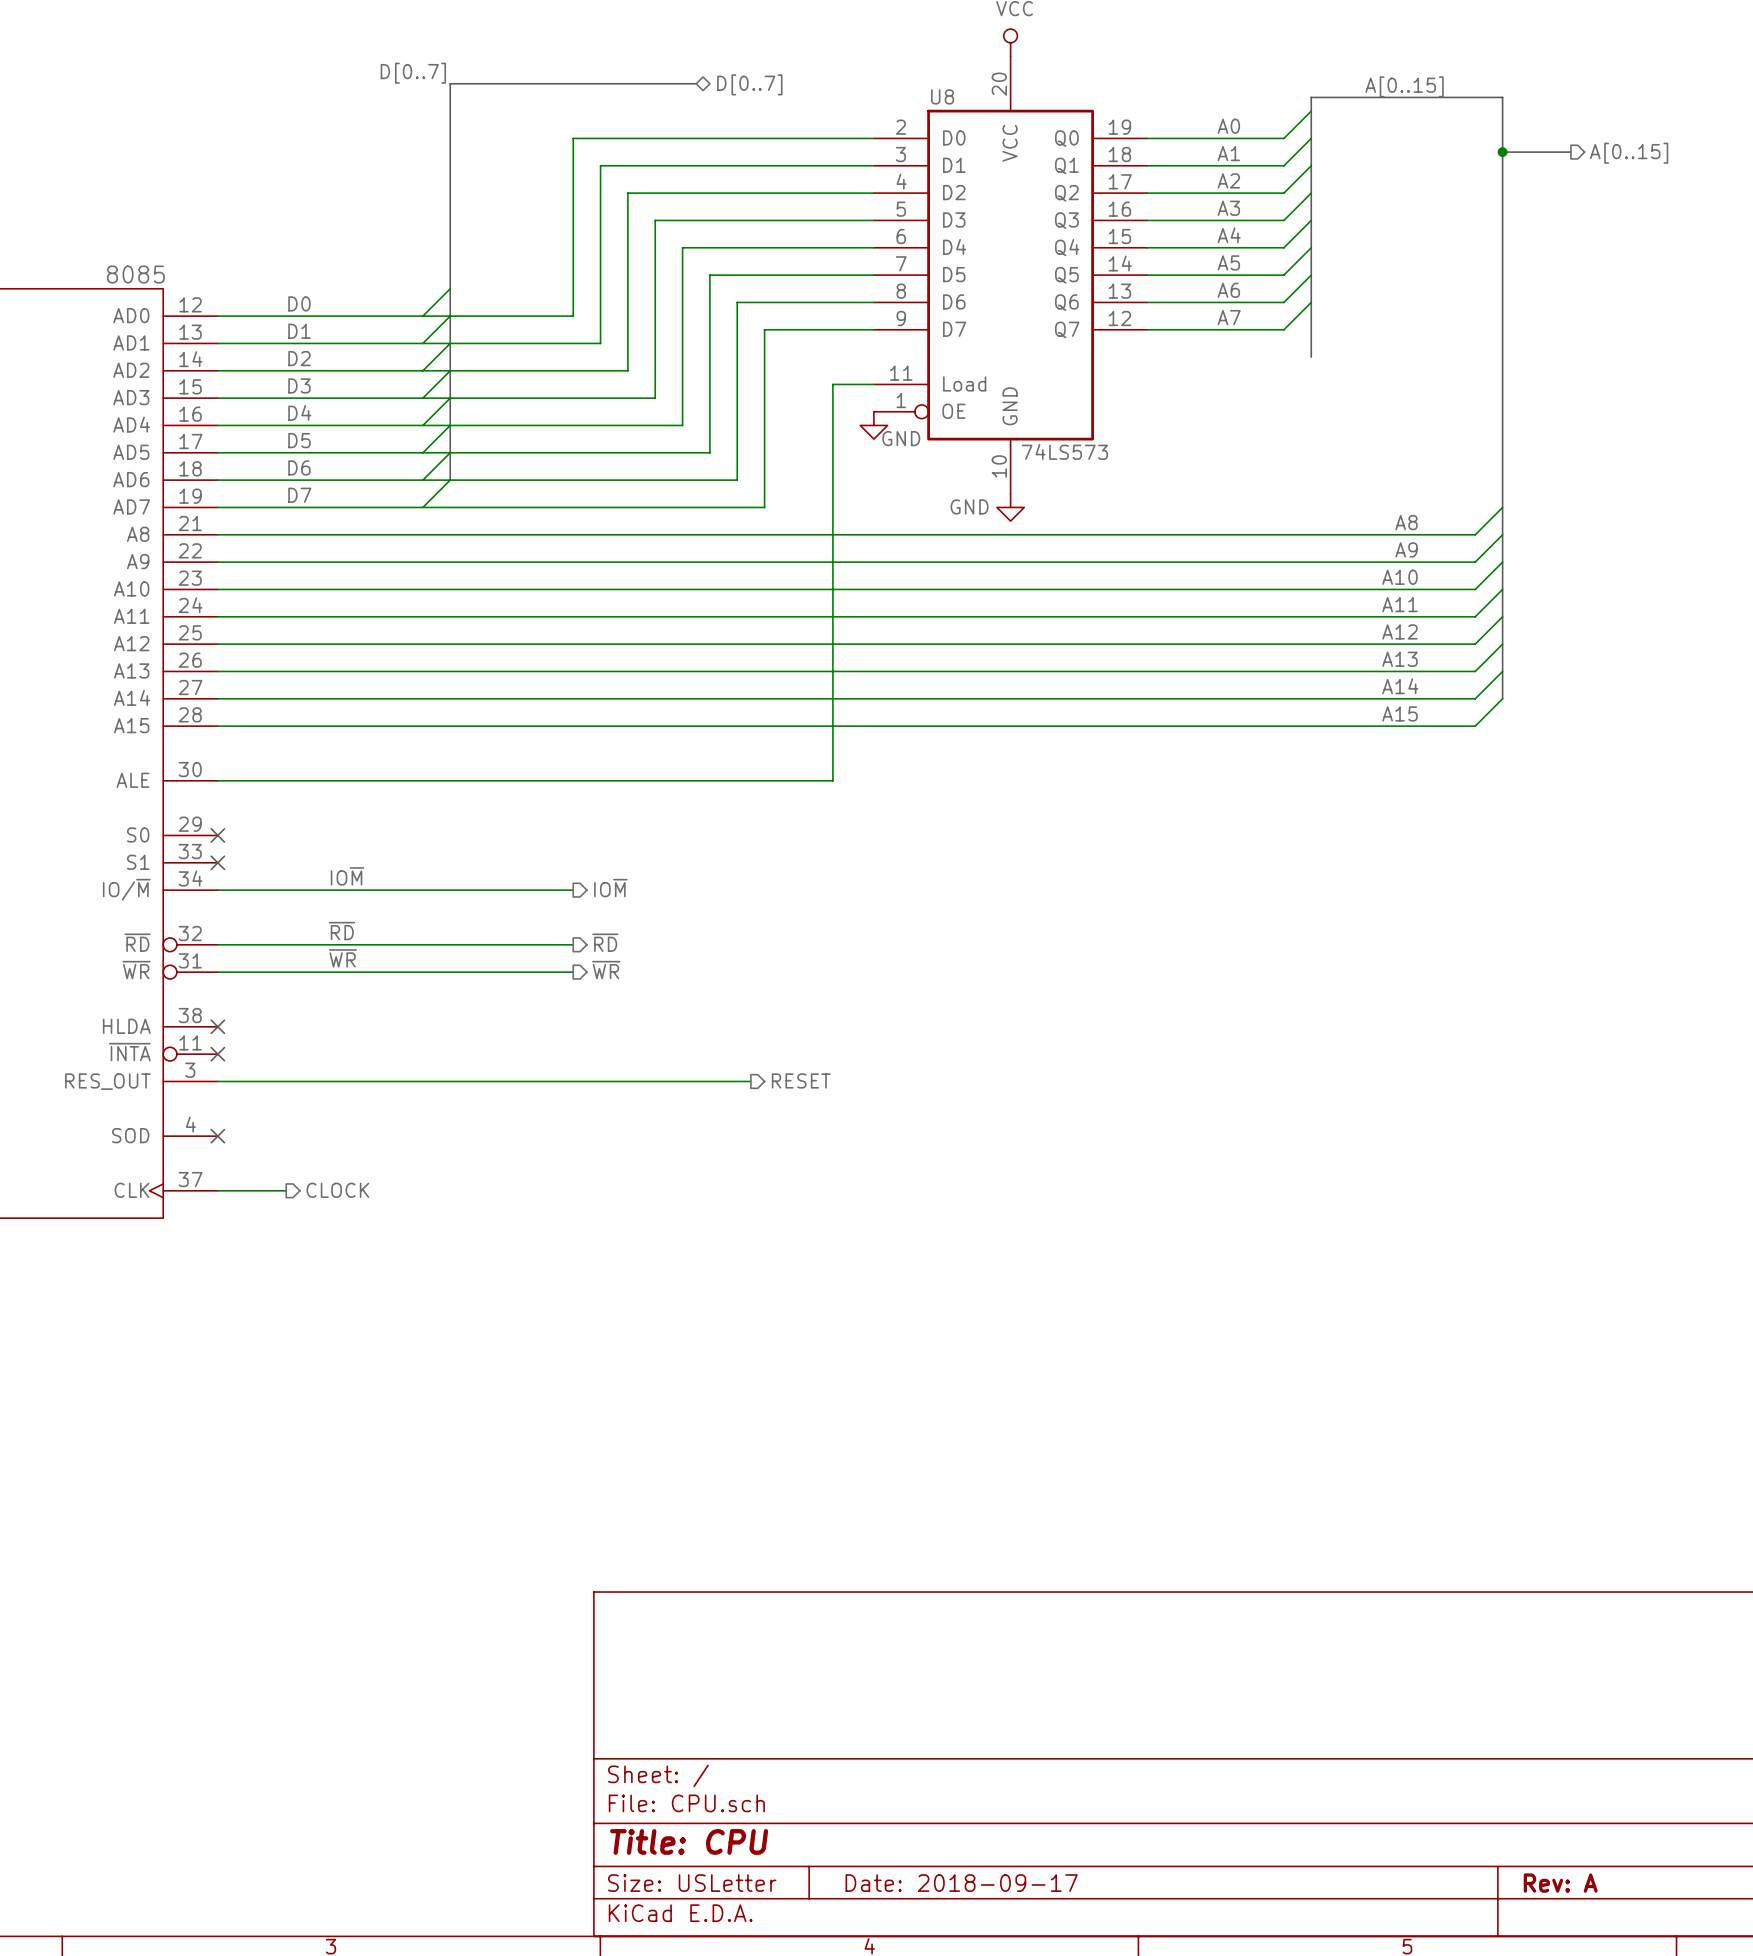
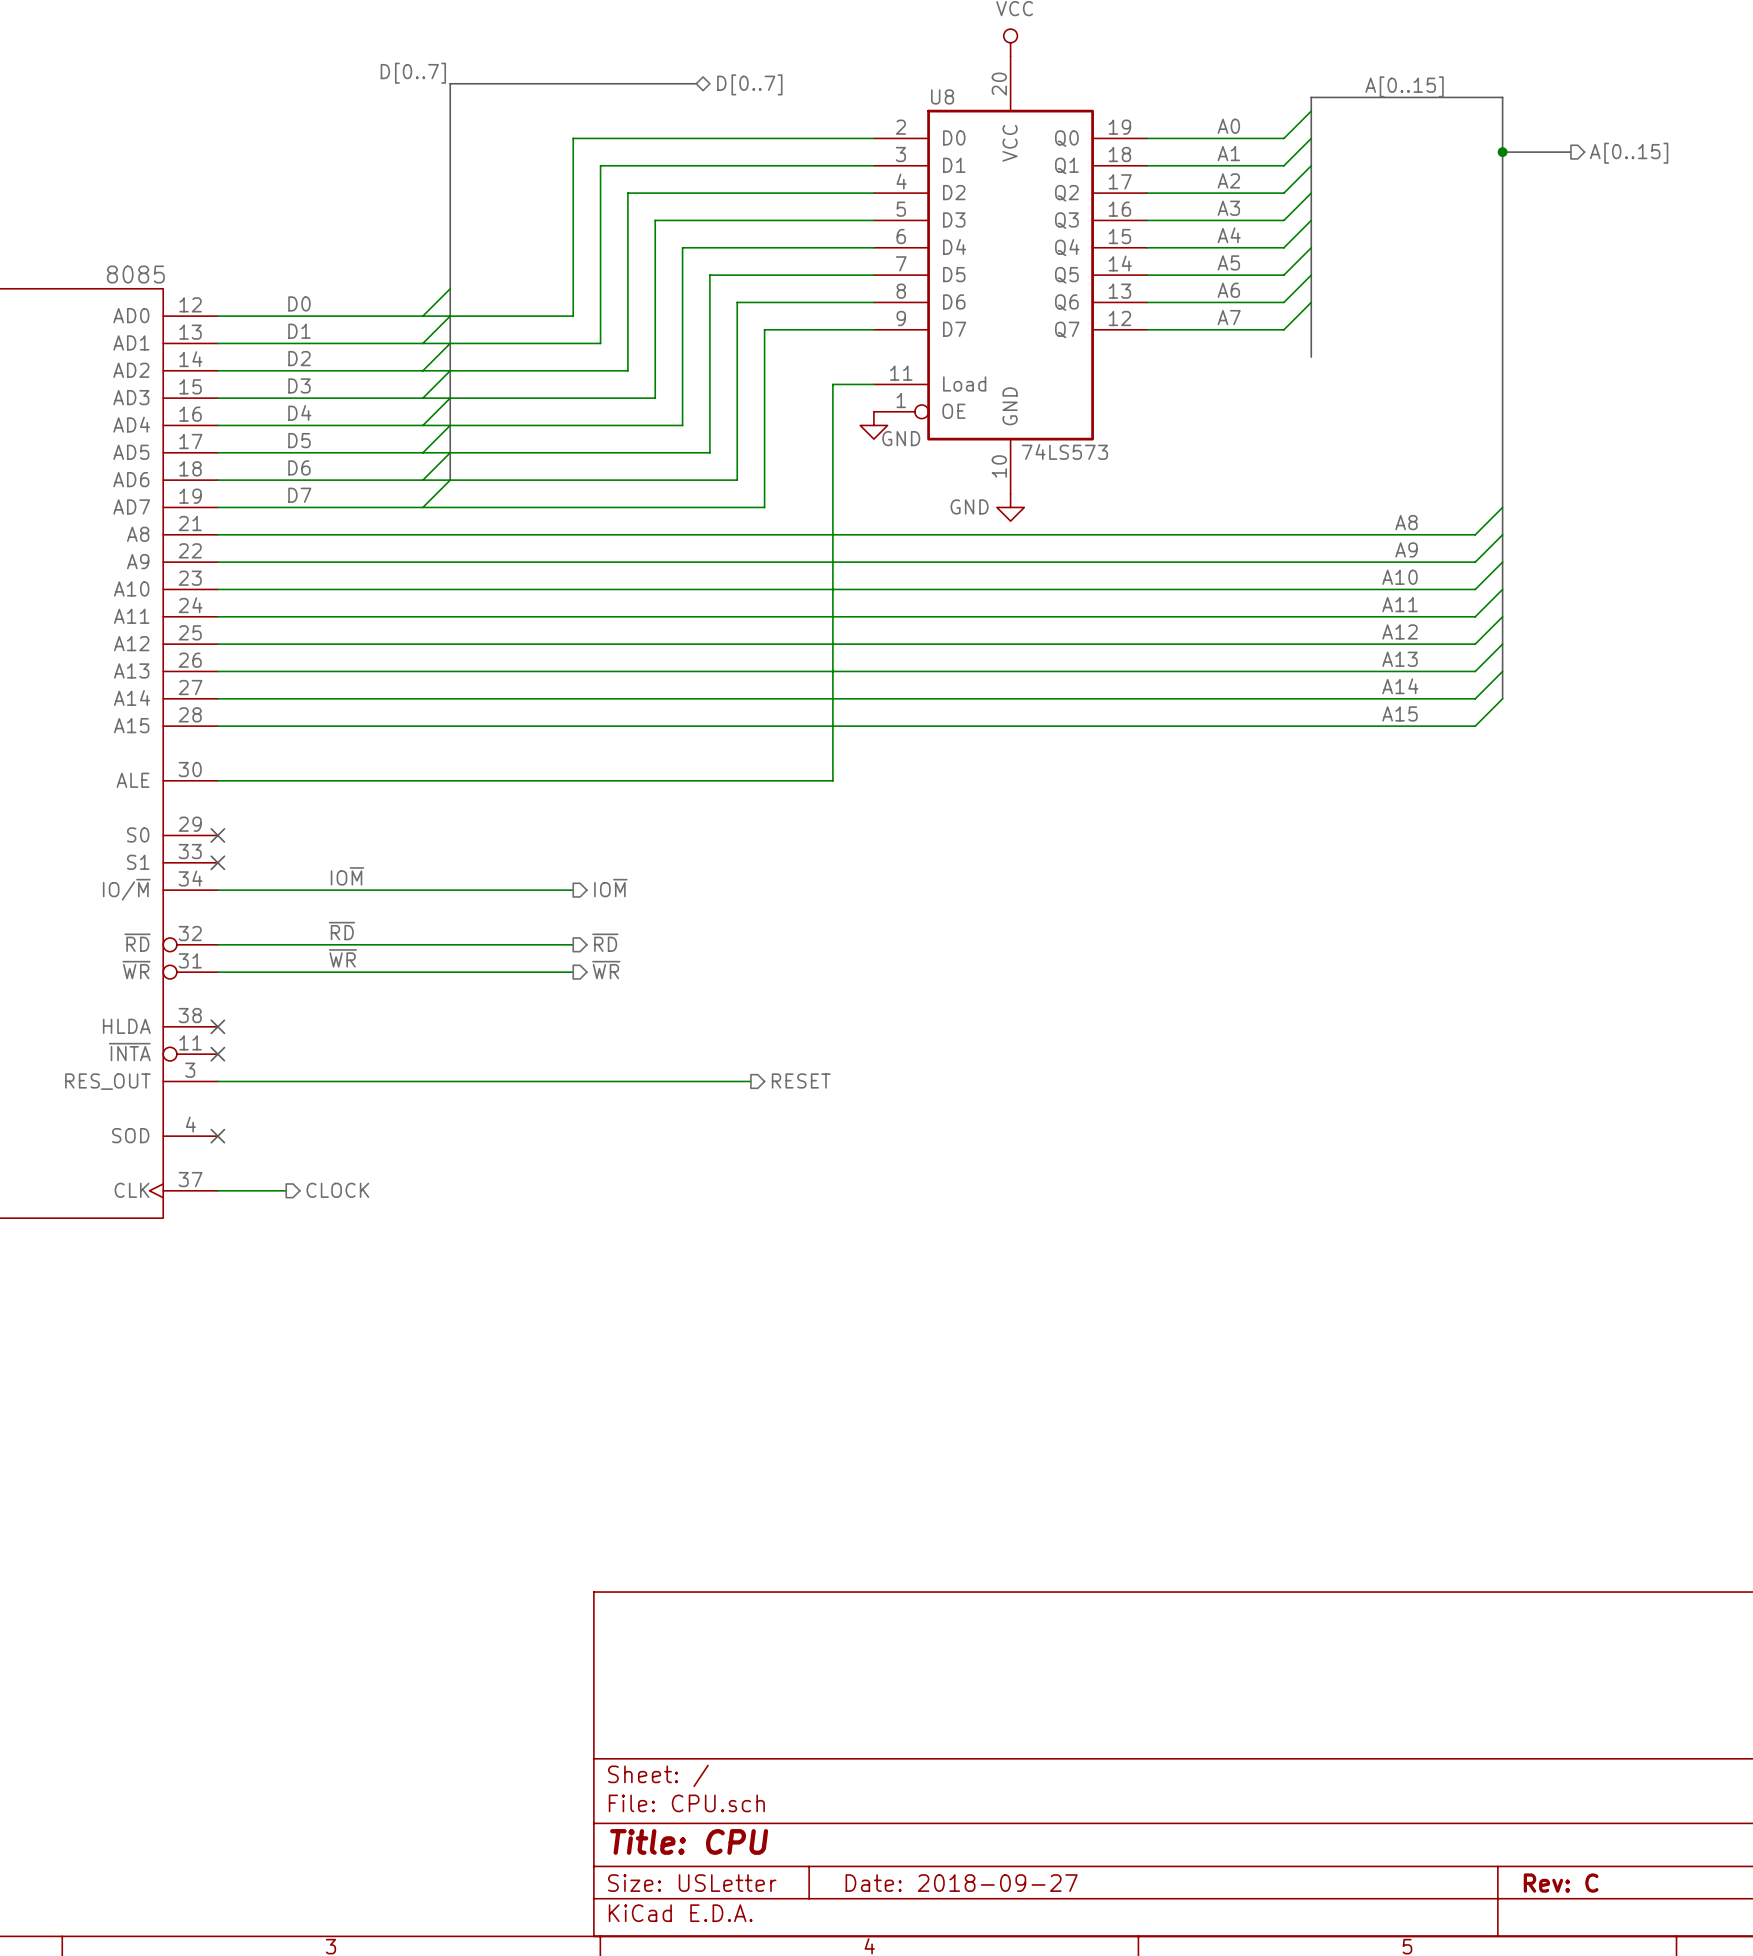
title block: Date: 2018-09-17 (961, 1883) -> Date: 2018-09-27 (961, 1883)
title block: Rev: A (1560, 1883) -> Rev: C (1561, 1883)

